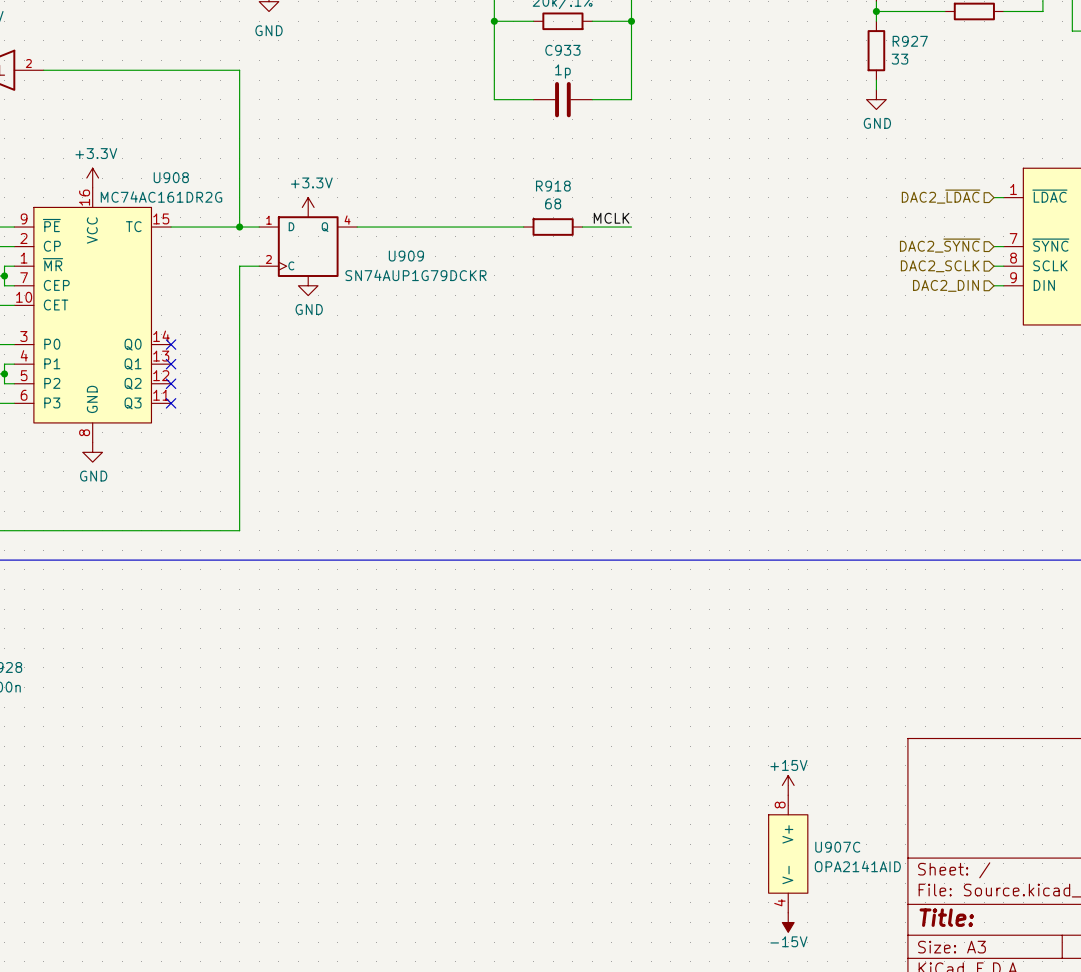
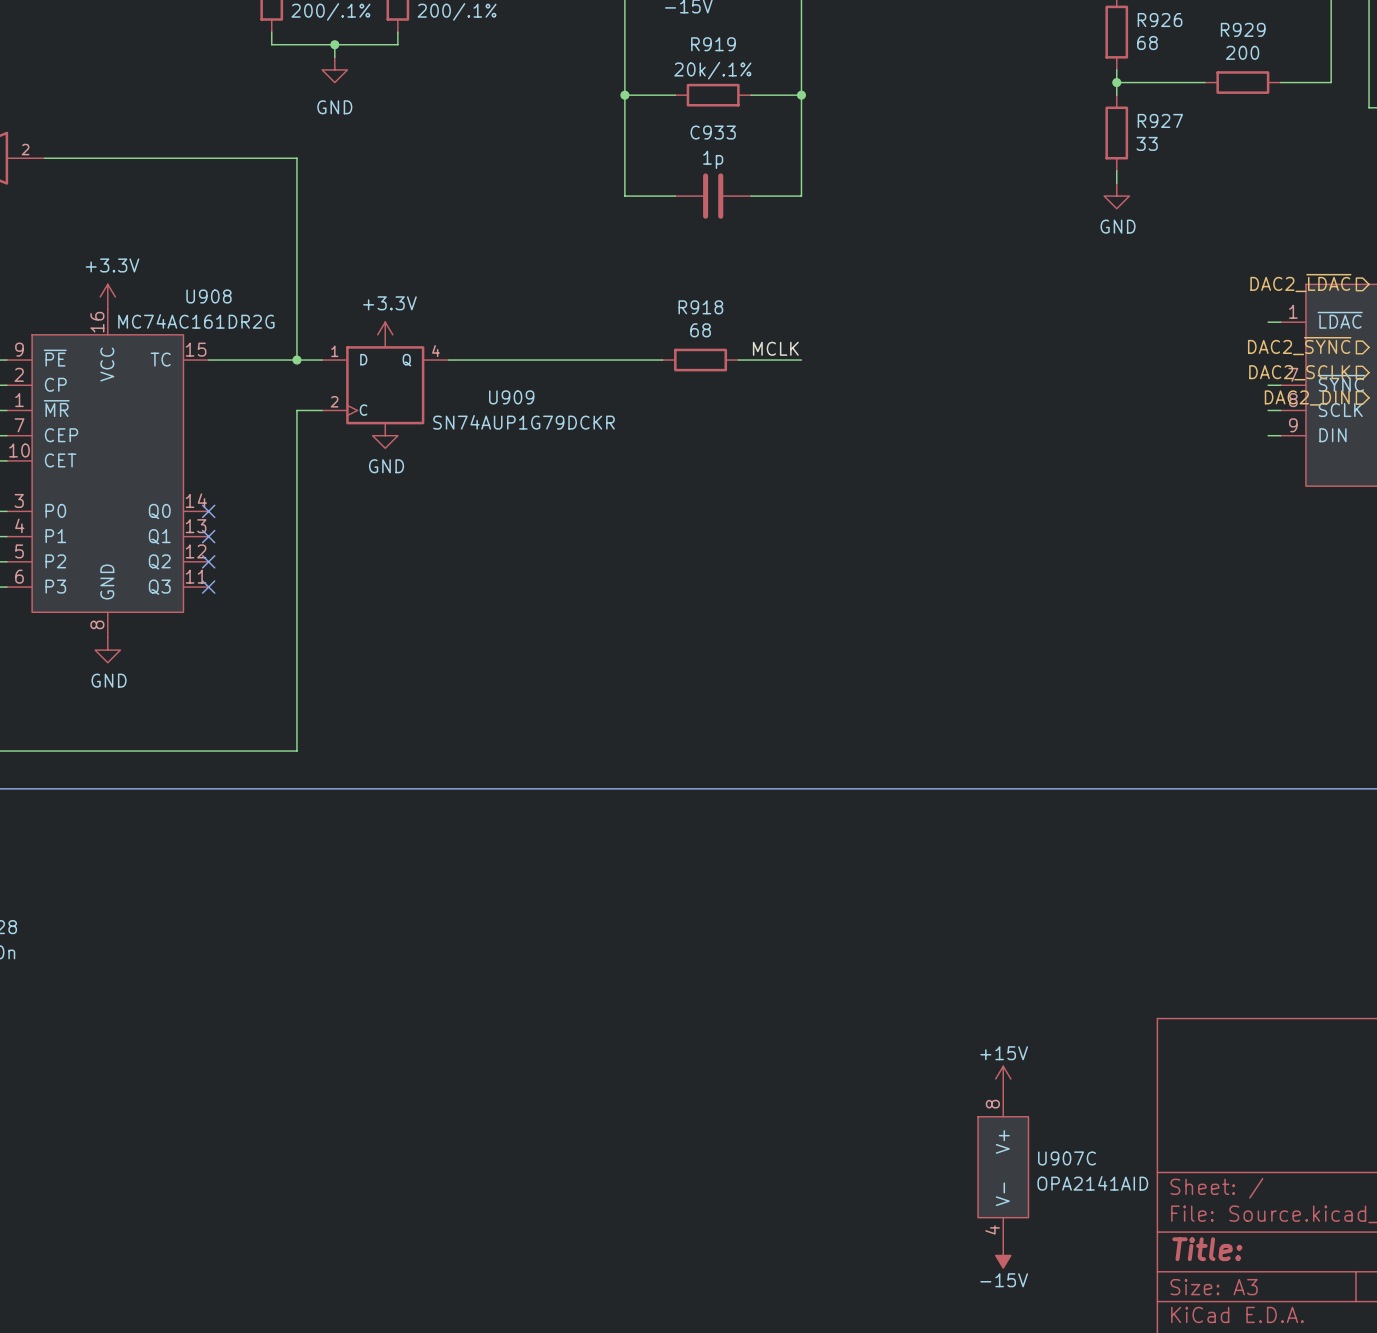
hierarchical label position: DAC2_~{LDAC} (941, 196) -> DAC2_~{LDAC} (1300, 283)
hierarchical label position: DAC2_~{SYNC} (940, 245) -> DAC2_~{SYNC} (1299, 346)
hierarchical label position: DAC2_SCLK (940, 266) -> DAC2_SCLK (1299, 372)
hierarchical label position: DAC2_DIN (945, 285) -> DAC2_DIN (1307, 398)

